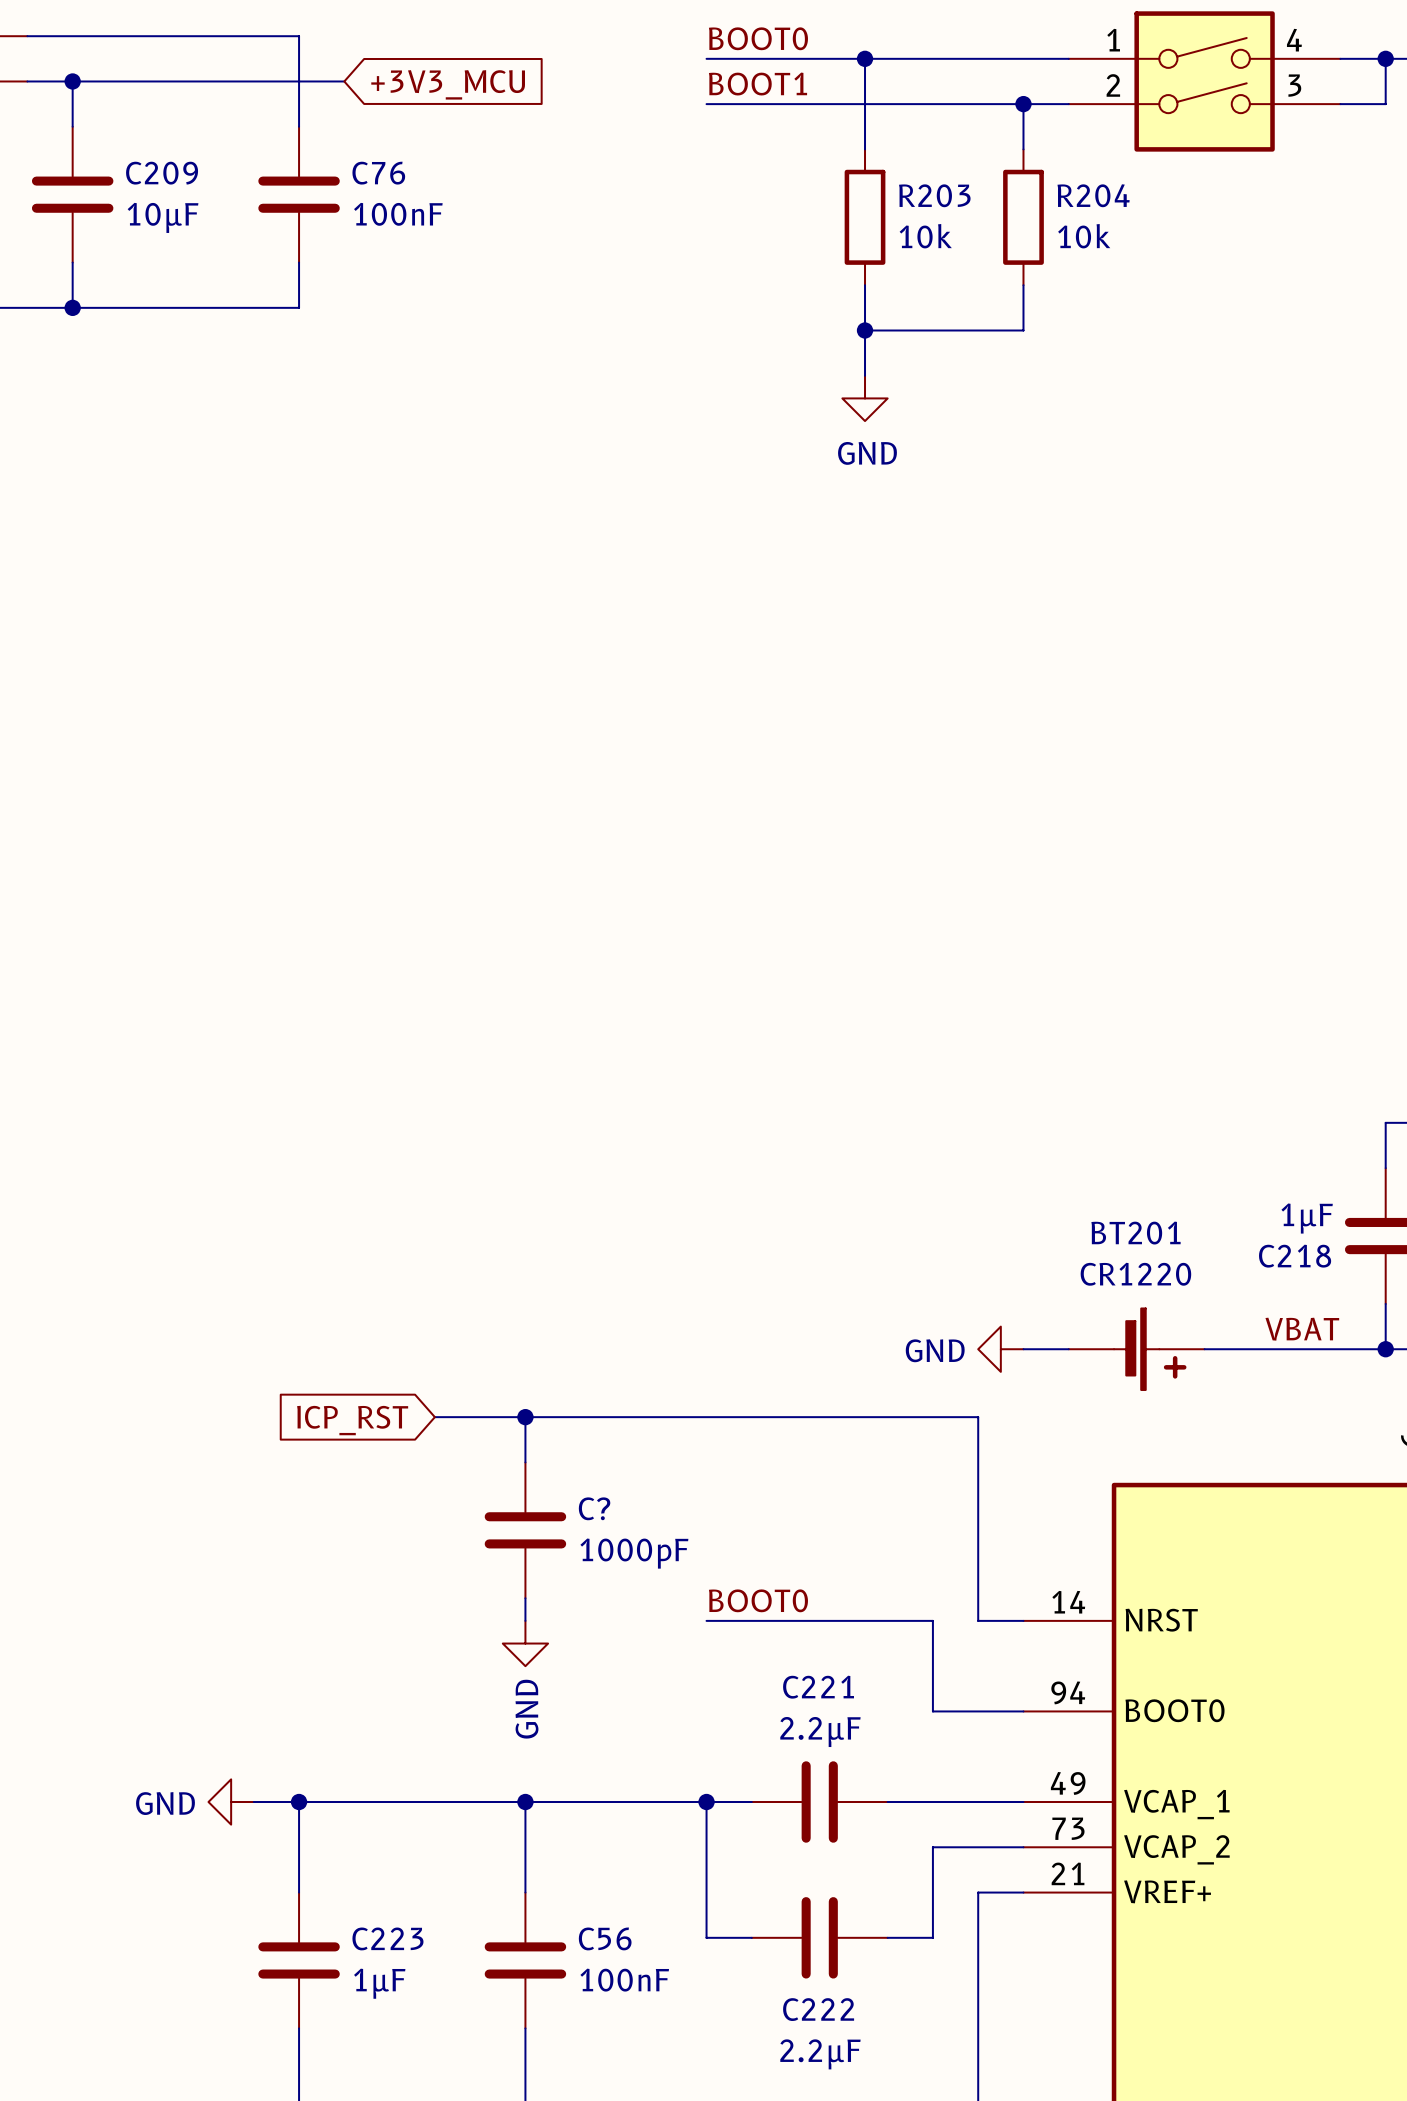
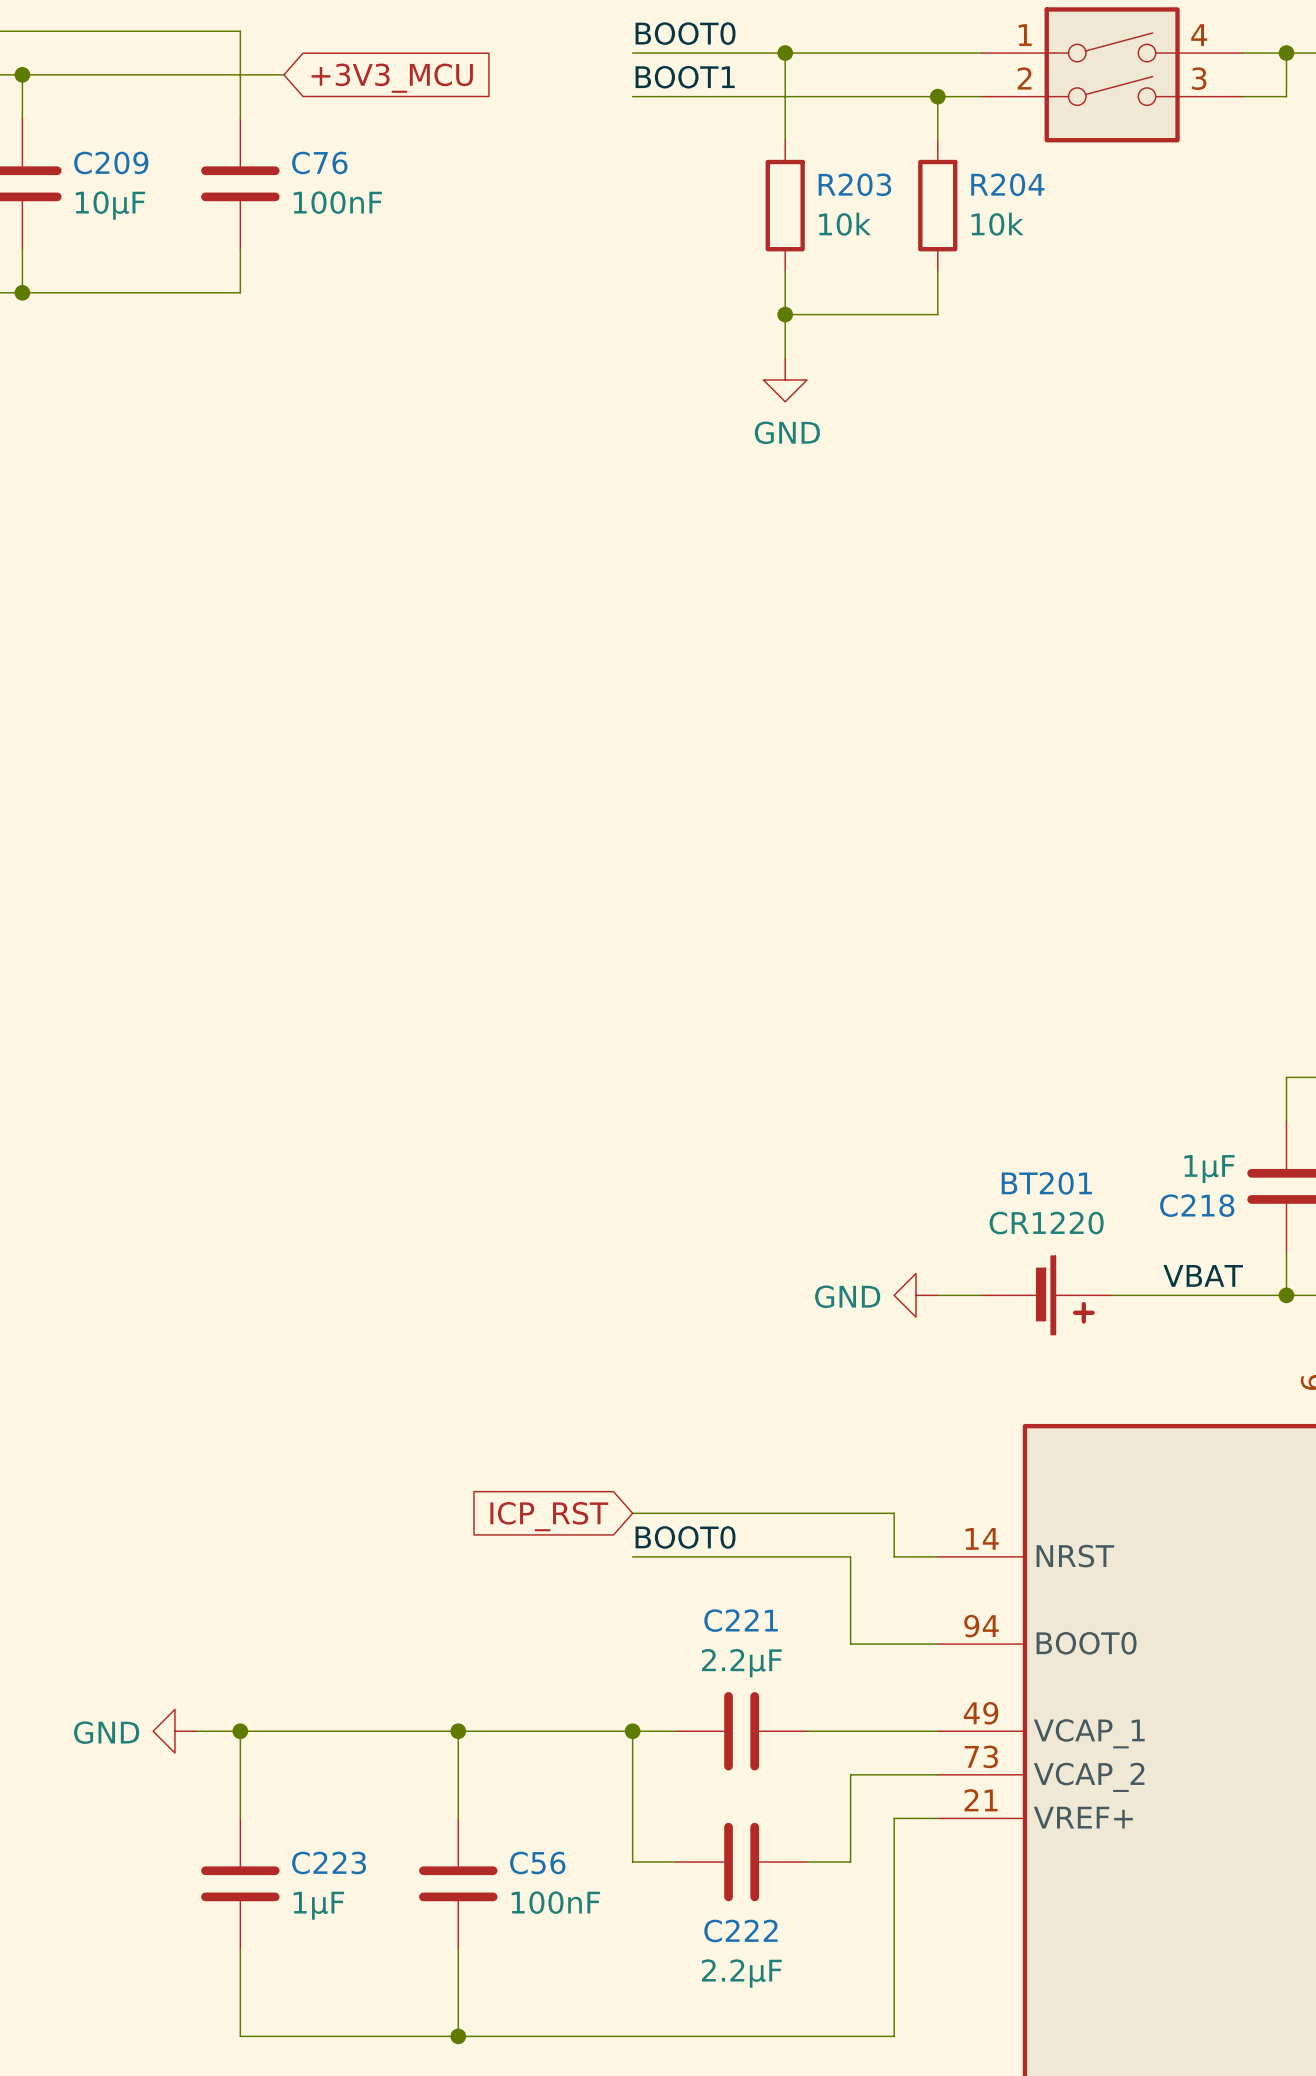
wire: (434, 1417) (978, 1417) (978, 1575) -> (632, 1513) (894, 1513)
wire: (525, 1417) (525, 1462) -> none
junction: (525, 1417) -> none
global label position: ICP_RST (352, 1420) -> ICP_RST (549, 1516)
C?: 1000pF (525, 1530) -> none
wire: (525, 1598) (525, 1620) -> none
power symbol: GND (525, 1643) -> none

